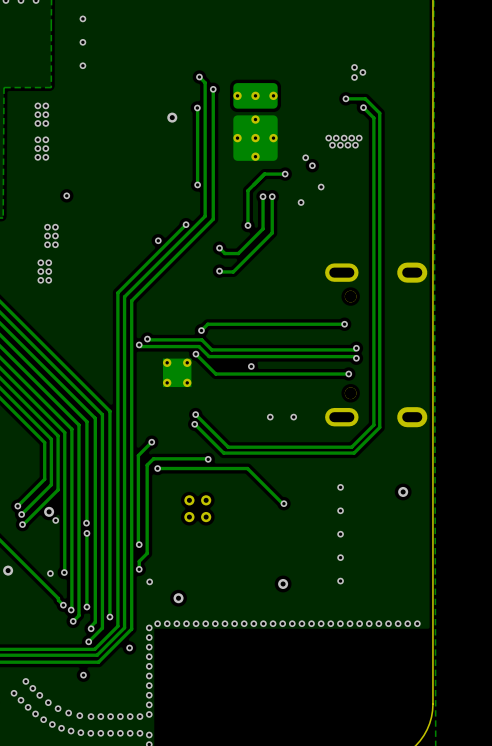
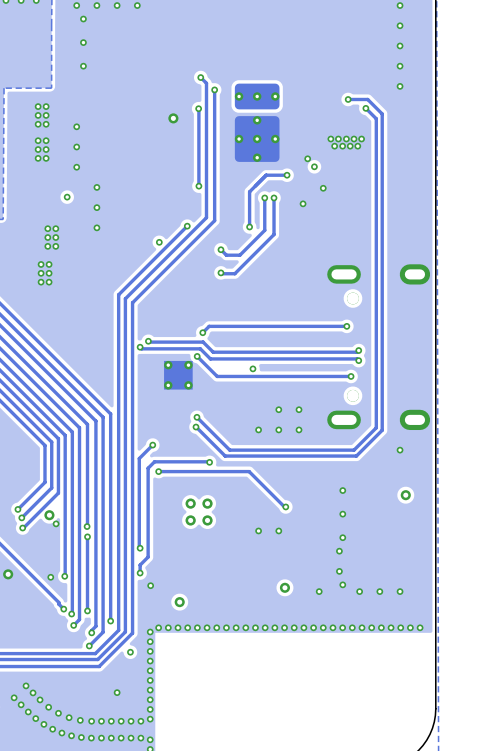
via: none -> (76, 5)
via: none -> (96, 5)
via: none -> (117, 5)
via: none -> (137, 5)
via: none -> (400, 5)
via: none -> (400, 25)
via: none -> (400, 45)
via: none -> (400, 66)
via: (354, 67) -> none
via: (362, 72) -> none
via: (354, 77) -> none
via: none -> (400, 86)
via: none -> (76, 126)
via: none -> (76, 147)
via: none -> (76, 167)
via: none -> (96, 187)
via: none -> (96, 207)
via: none -> (96, 227)
via: none -> (278, 409)
via: none -> (299, 409)
via: (270, 417) -> none
via: (293, 417) -> none
via: none -> (258, 429)
via: none -> (278, 429)
via: none -> (299, 429)
via: none -> (400, 450)
via: none -> (258, 530)
via: none -> (278, 530)
via: none -> (339, 551)
via: (340, 557) -> none
via: none -> (339, 571)
via: none -> (319, 591)
via: none -> (359, 591)
via: none -> (379, 591)
via: none -> (400, 591)
via position: (83, 675) -> (117, 692)

